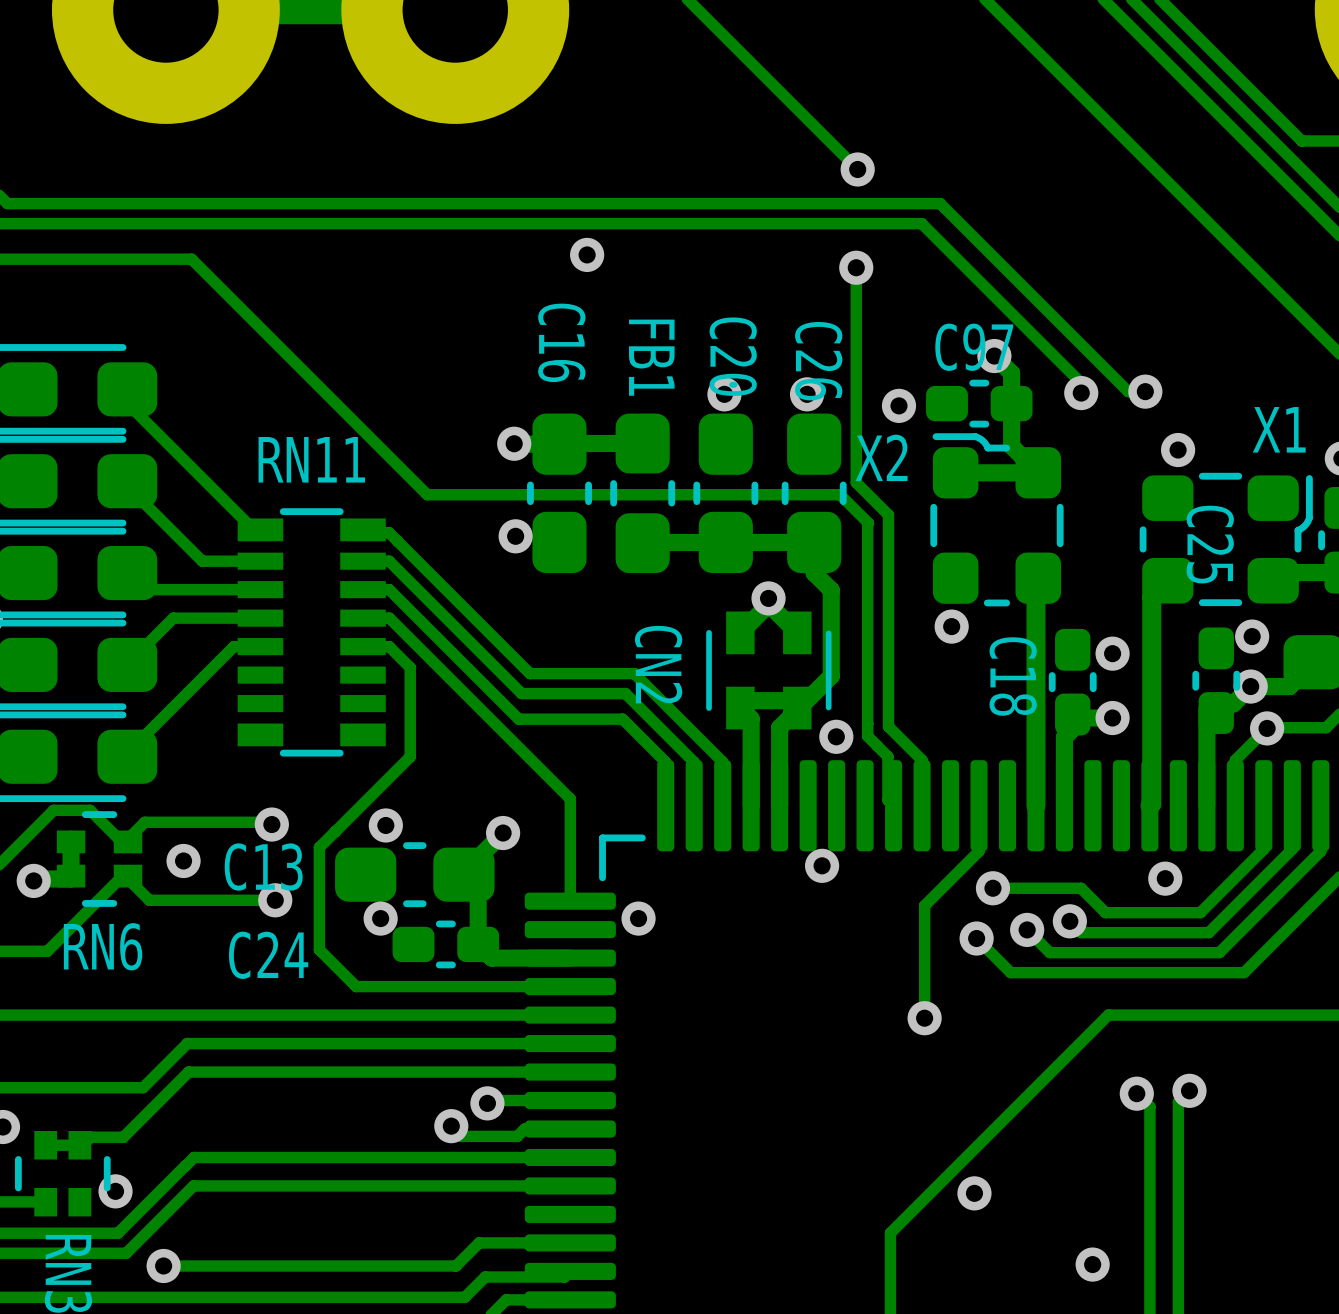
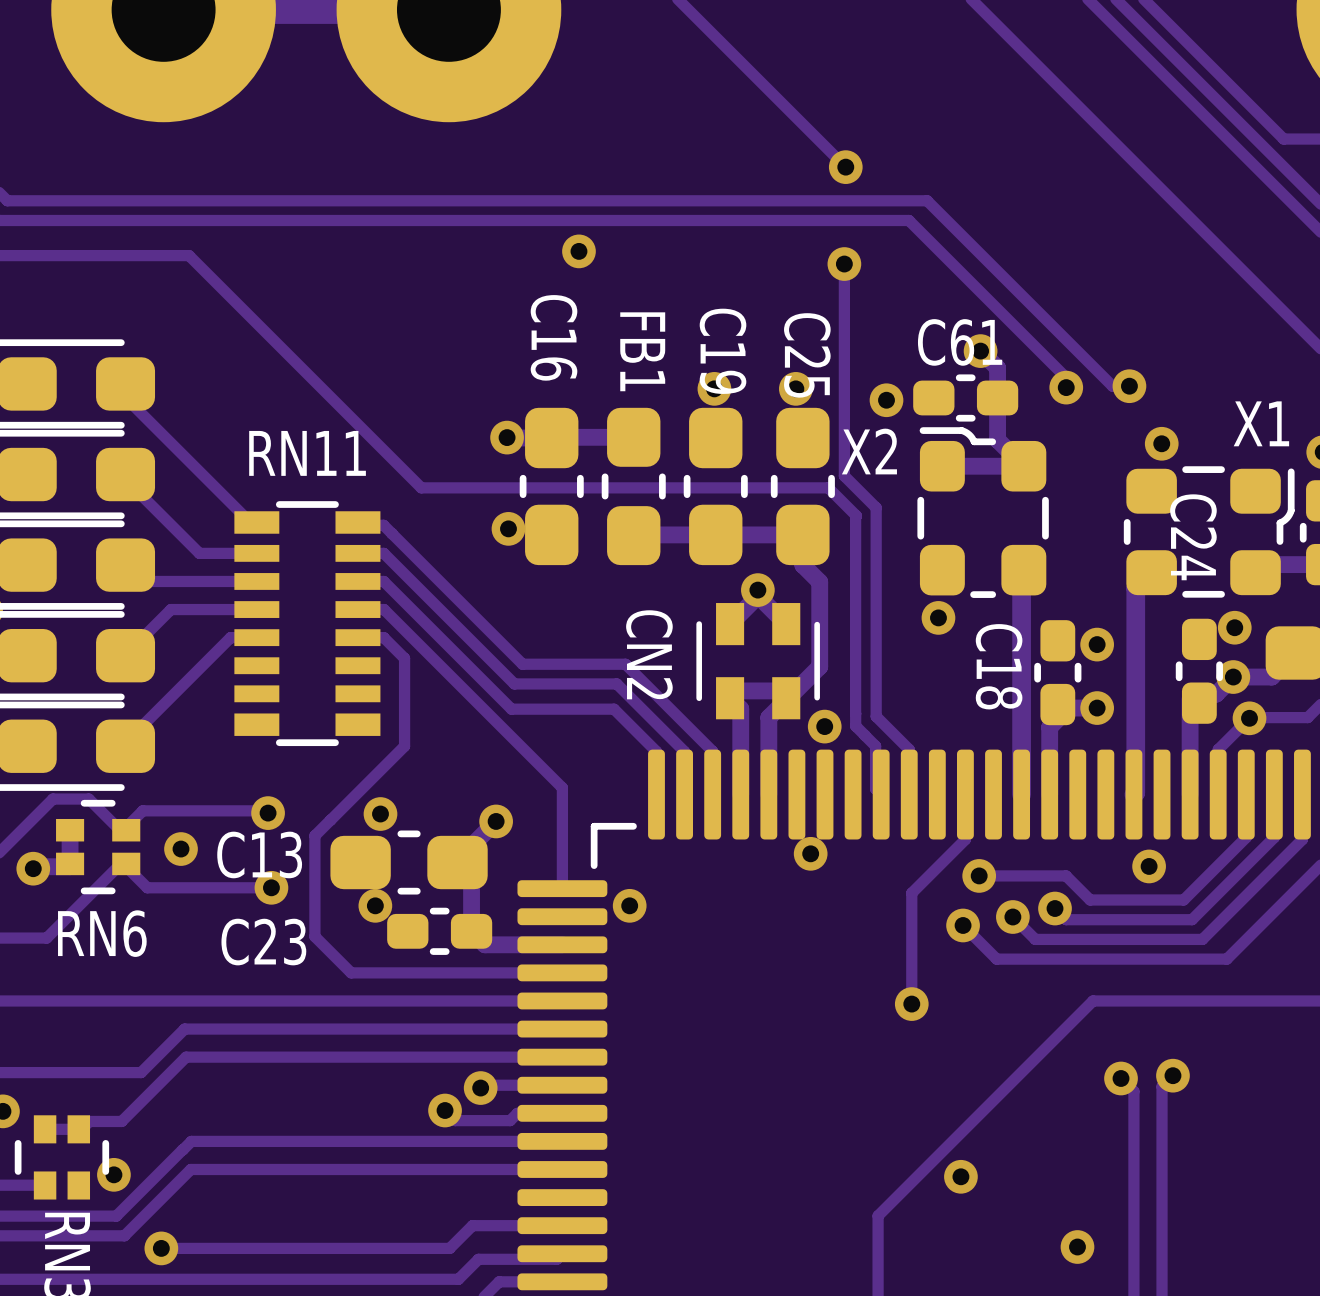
C97 name: C97 (974, 347) -> C61 (960, 342)
C20 name: C20 (733, 356) -> C19 (723, 351)
C26 name: C26 (818, 361) -> C25 (807, 355)
C25 name: C25 (1210, 544) -> C24 (1193, 537)
C24 name: C24 (268, 955) -> C23 (263, 942)

